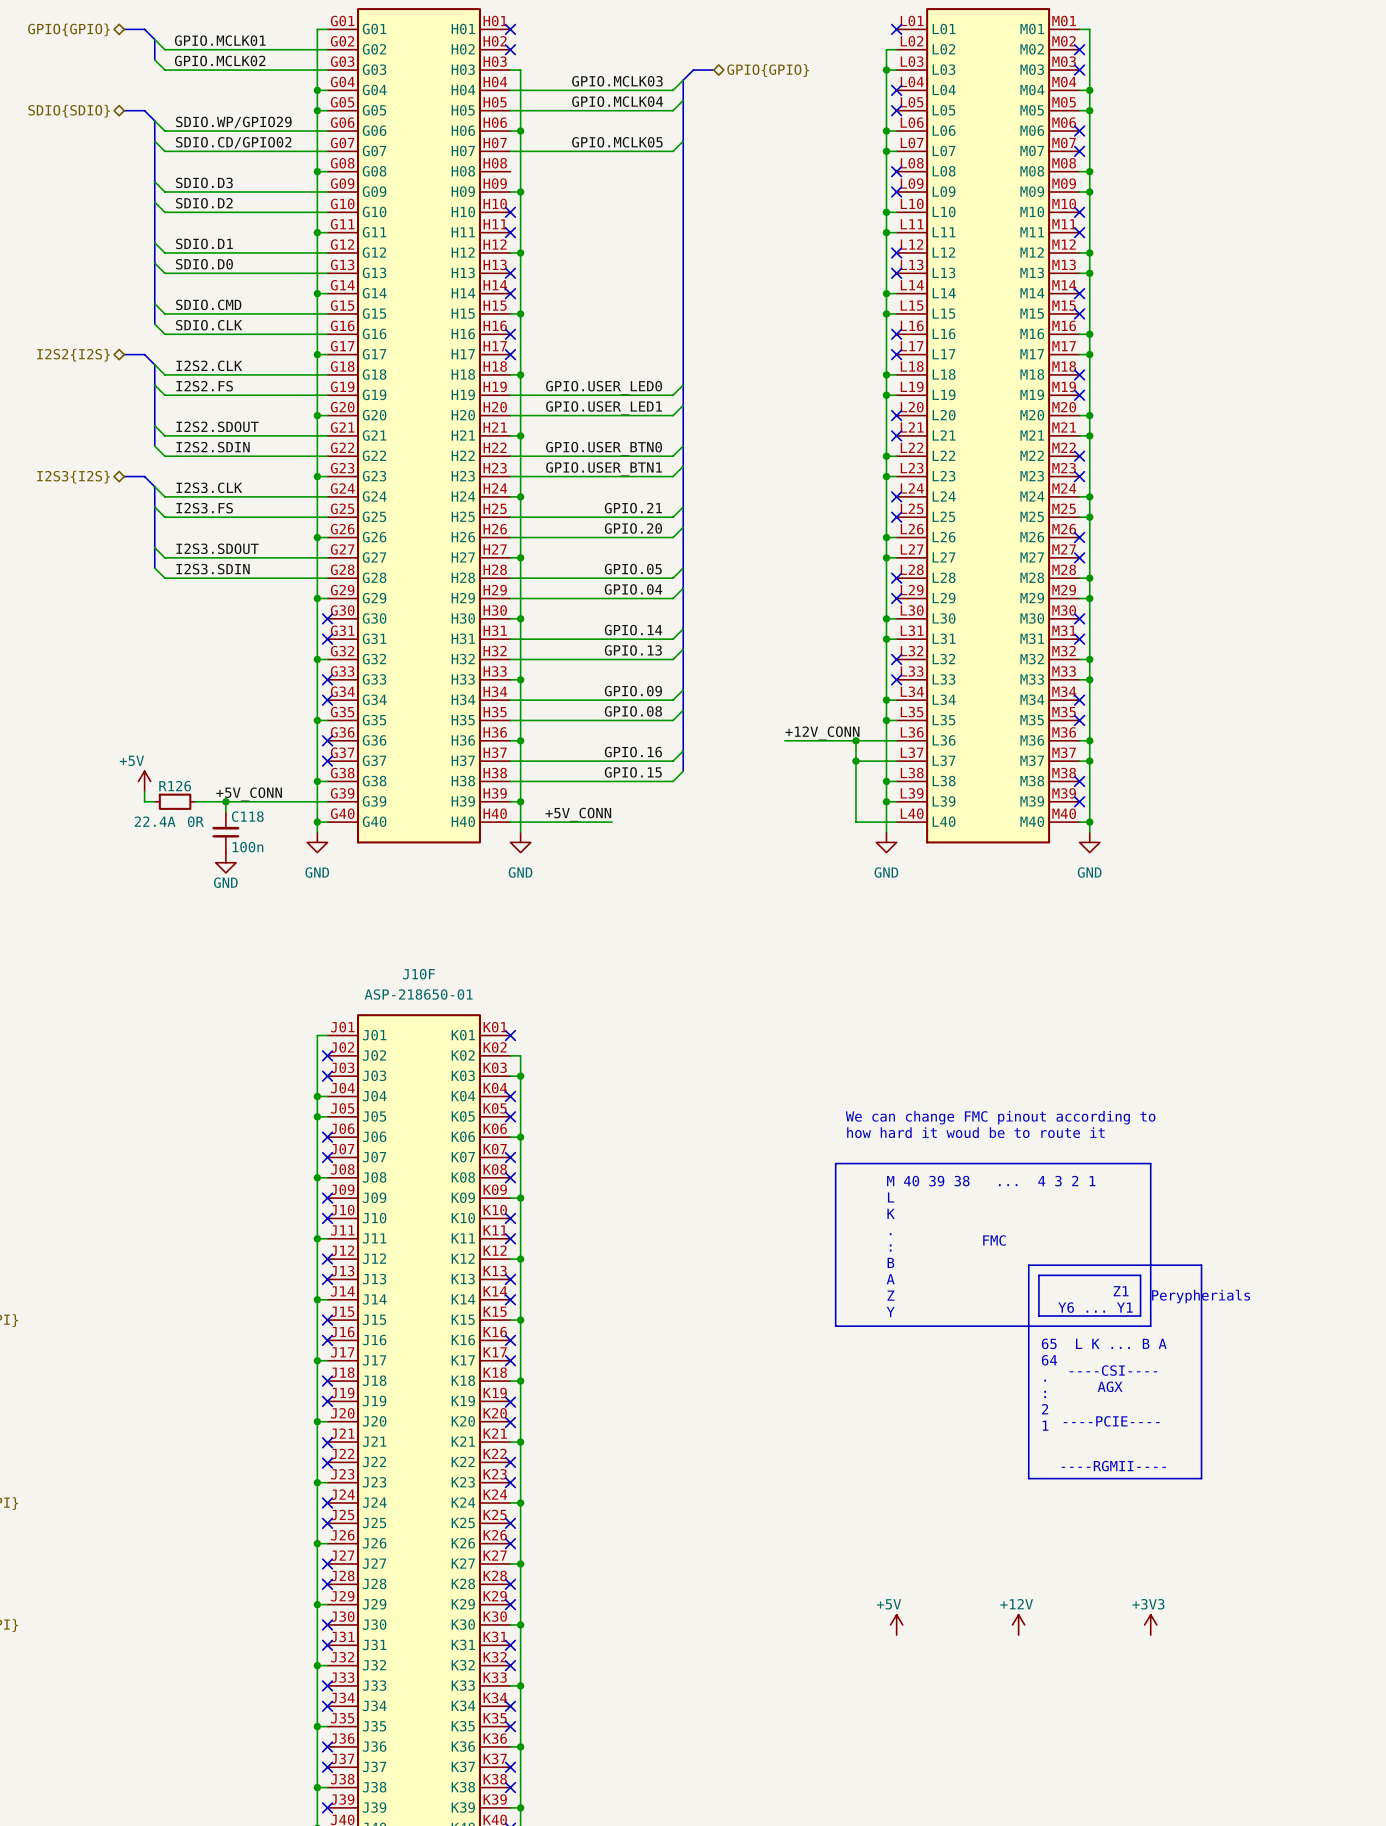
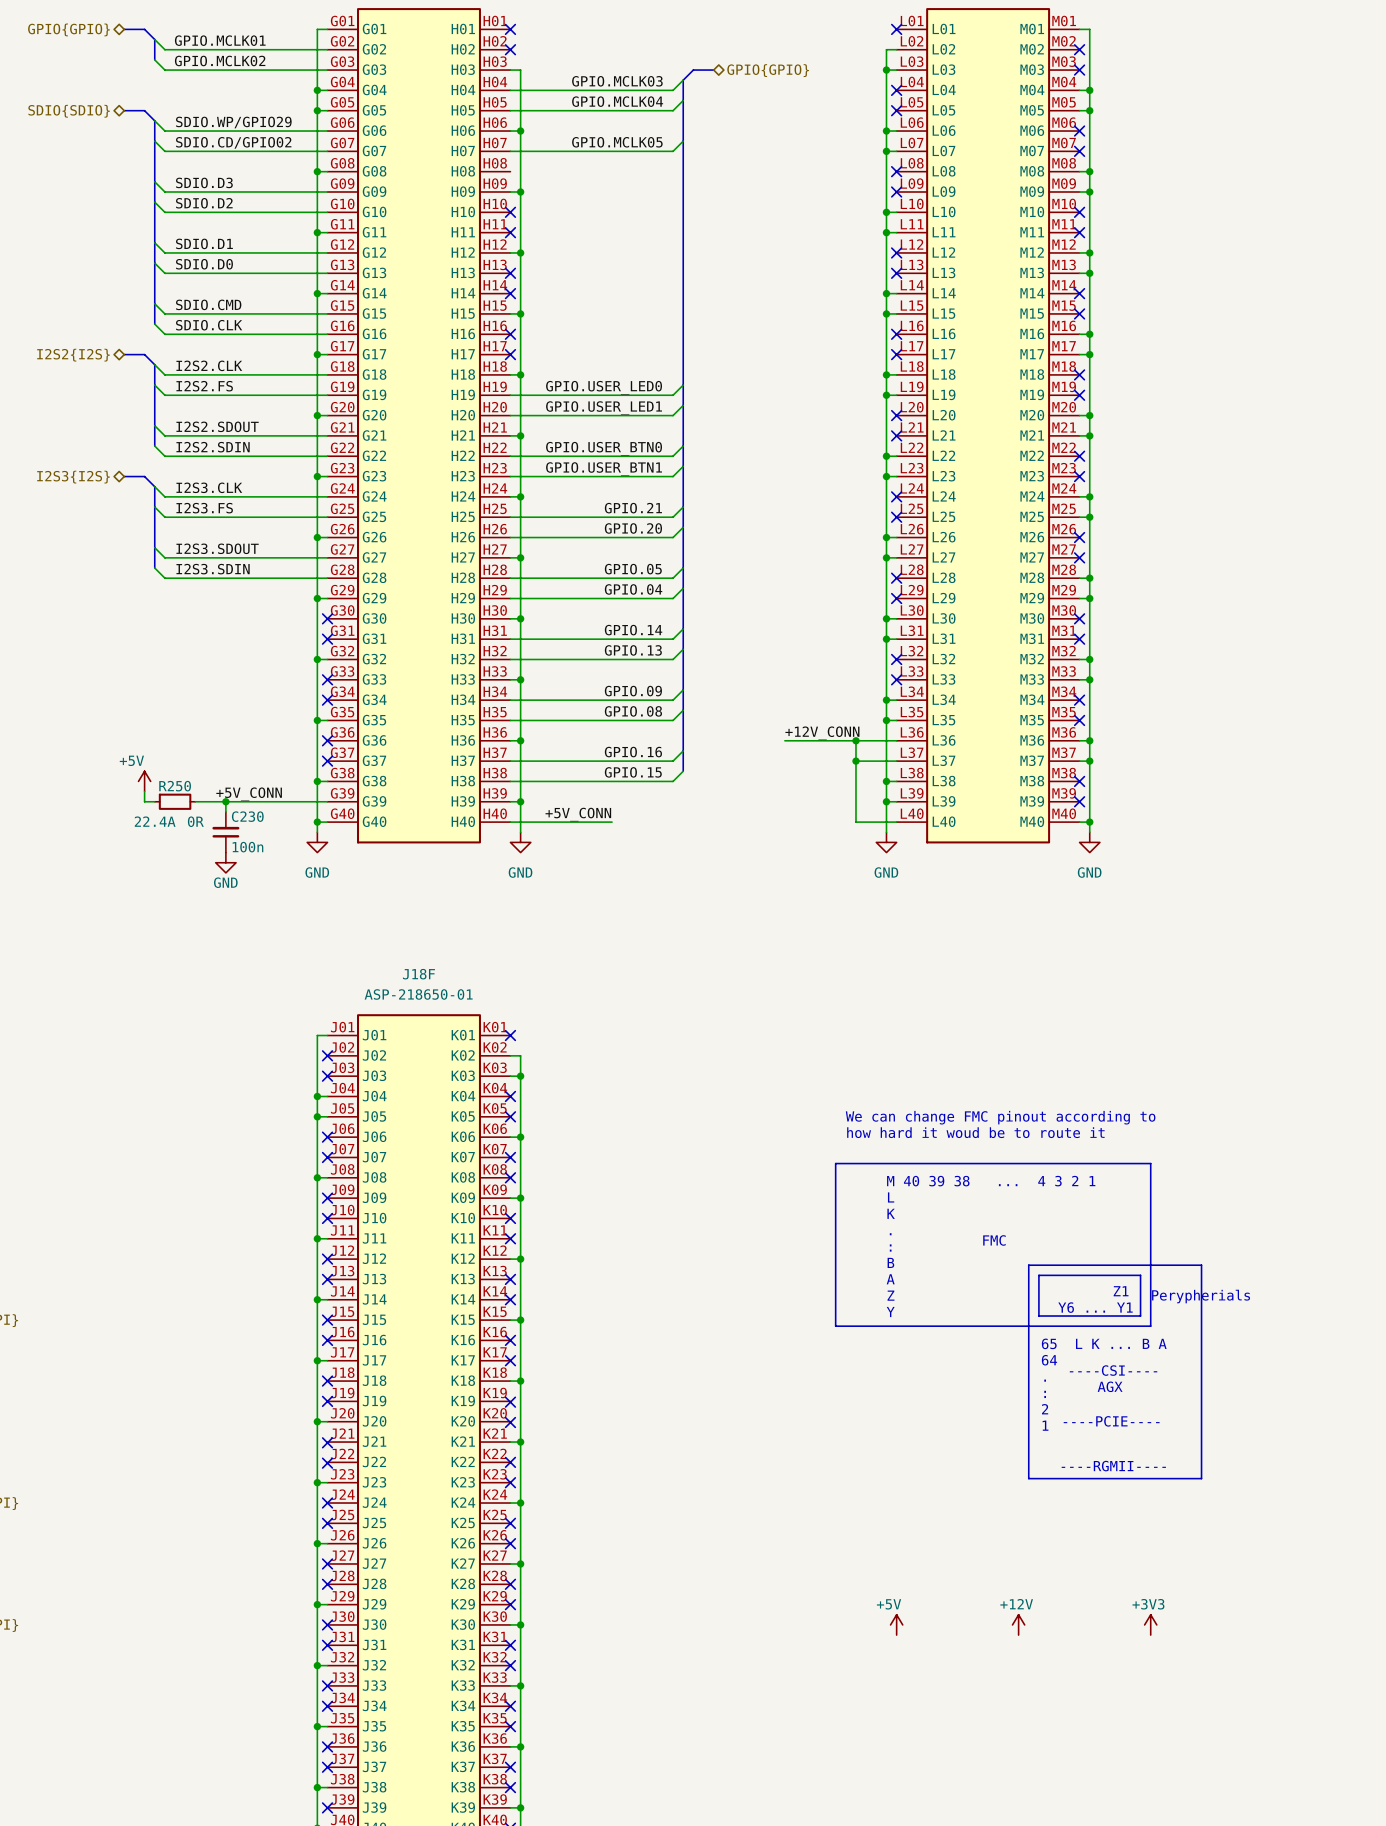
R126 name: R126 (175, 786) -> R250 (175, 786)
C118 name: C118 (247, 816) -> C230 (247, 816)
J10F name: J10F (418, 974) -> J18F (418, 974)

